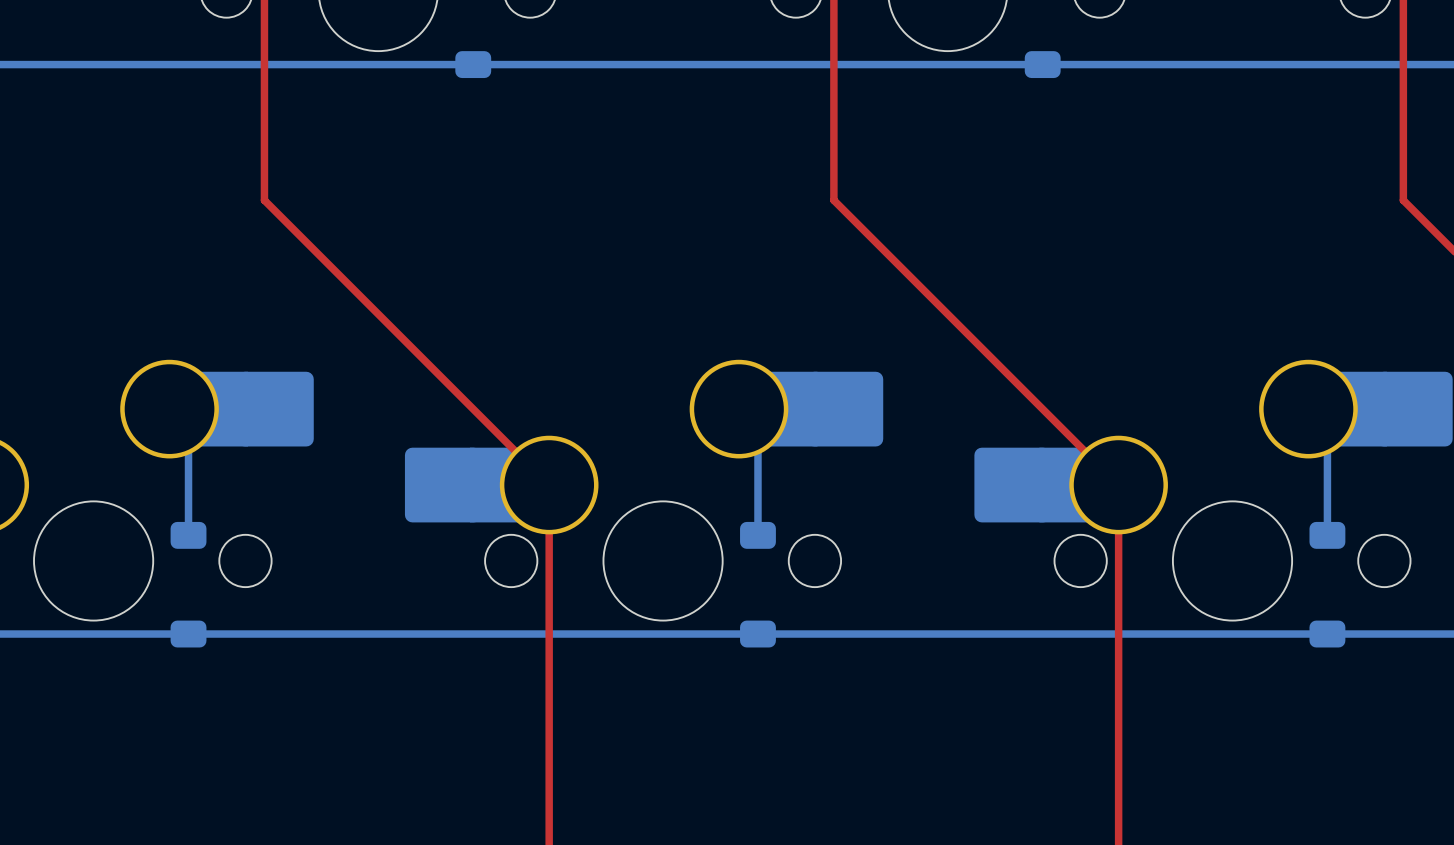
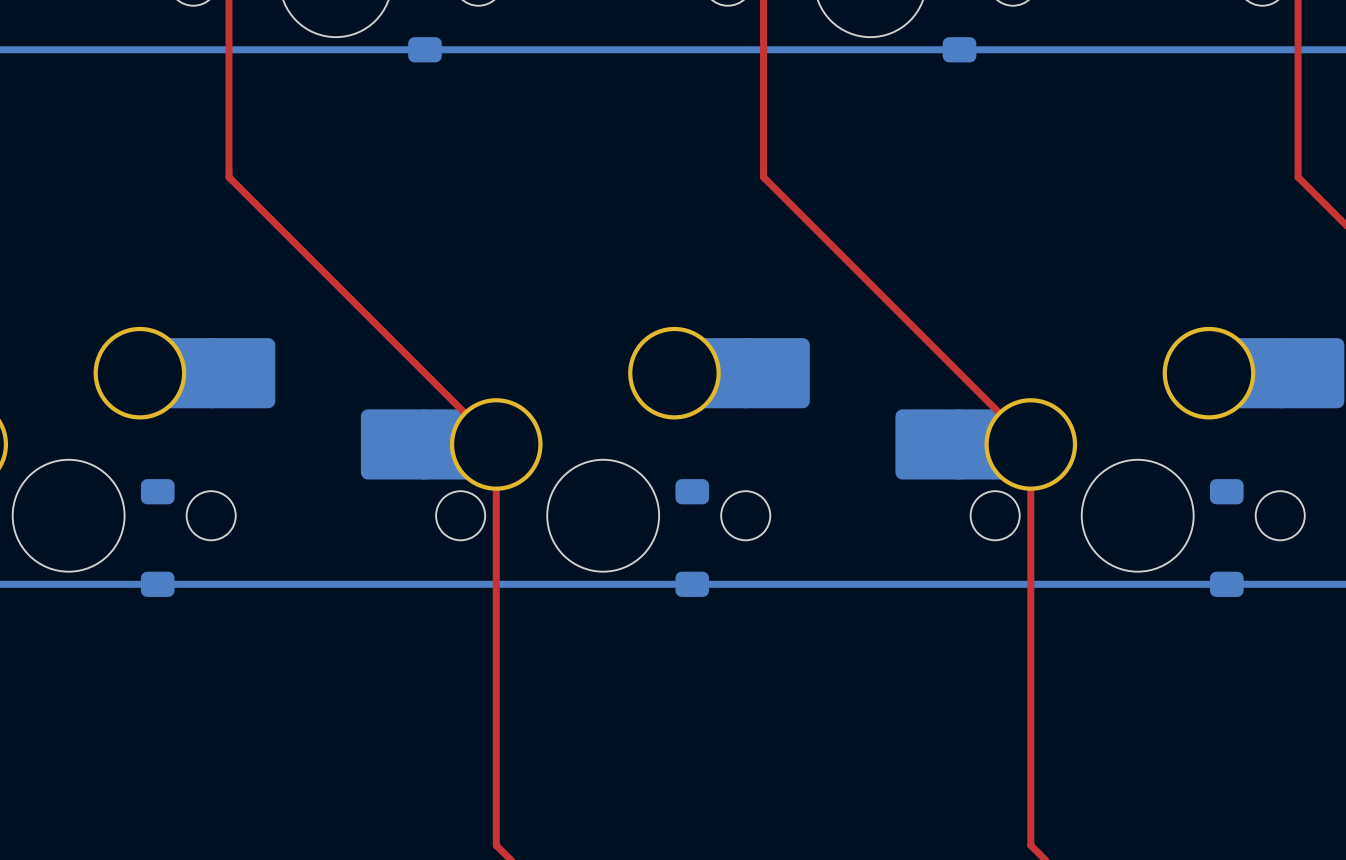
bottom track: (169, 409) (188, 428) (188, 535) -> none
bottom track: (738, 409) (757, 428) (757, 535) -> none
bottom track: (1308, 409) (1327, 428) (1327, 535) -> none

